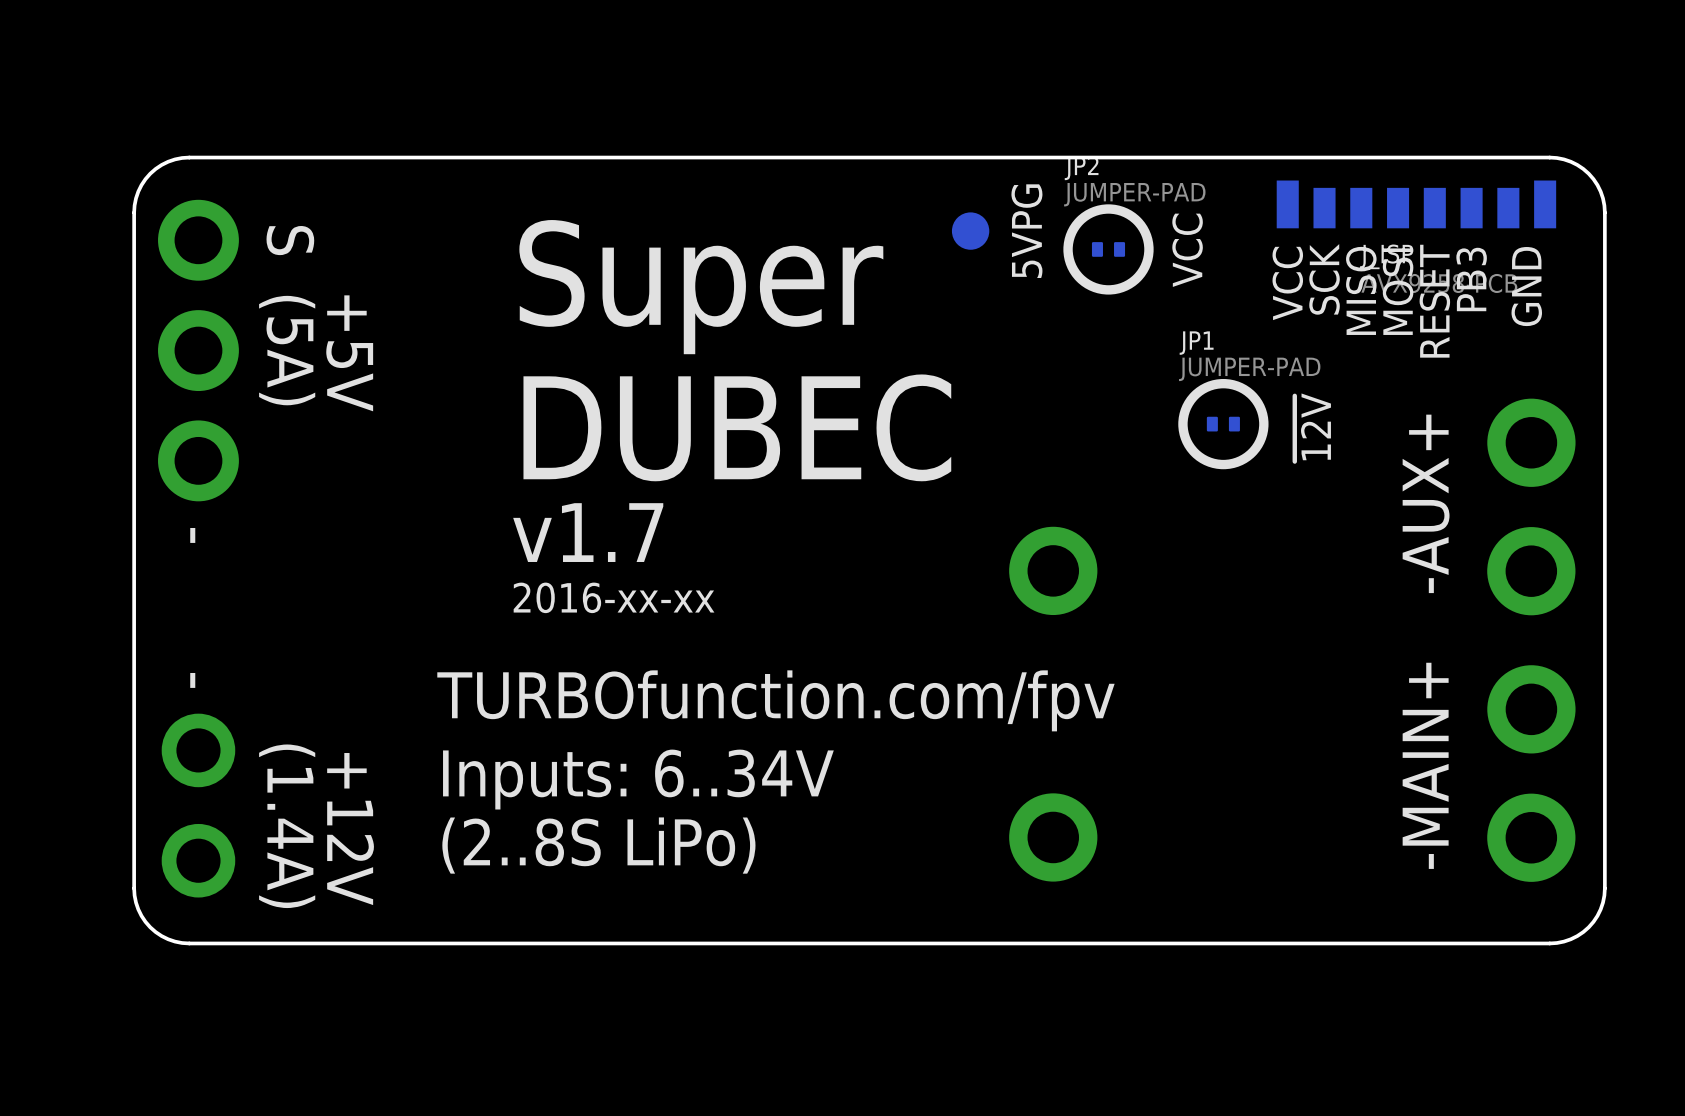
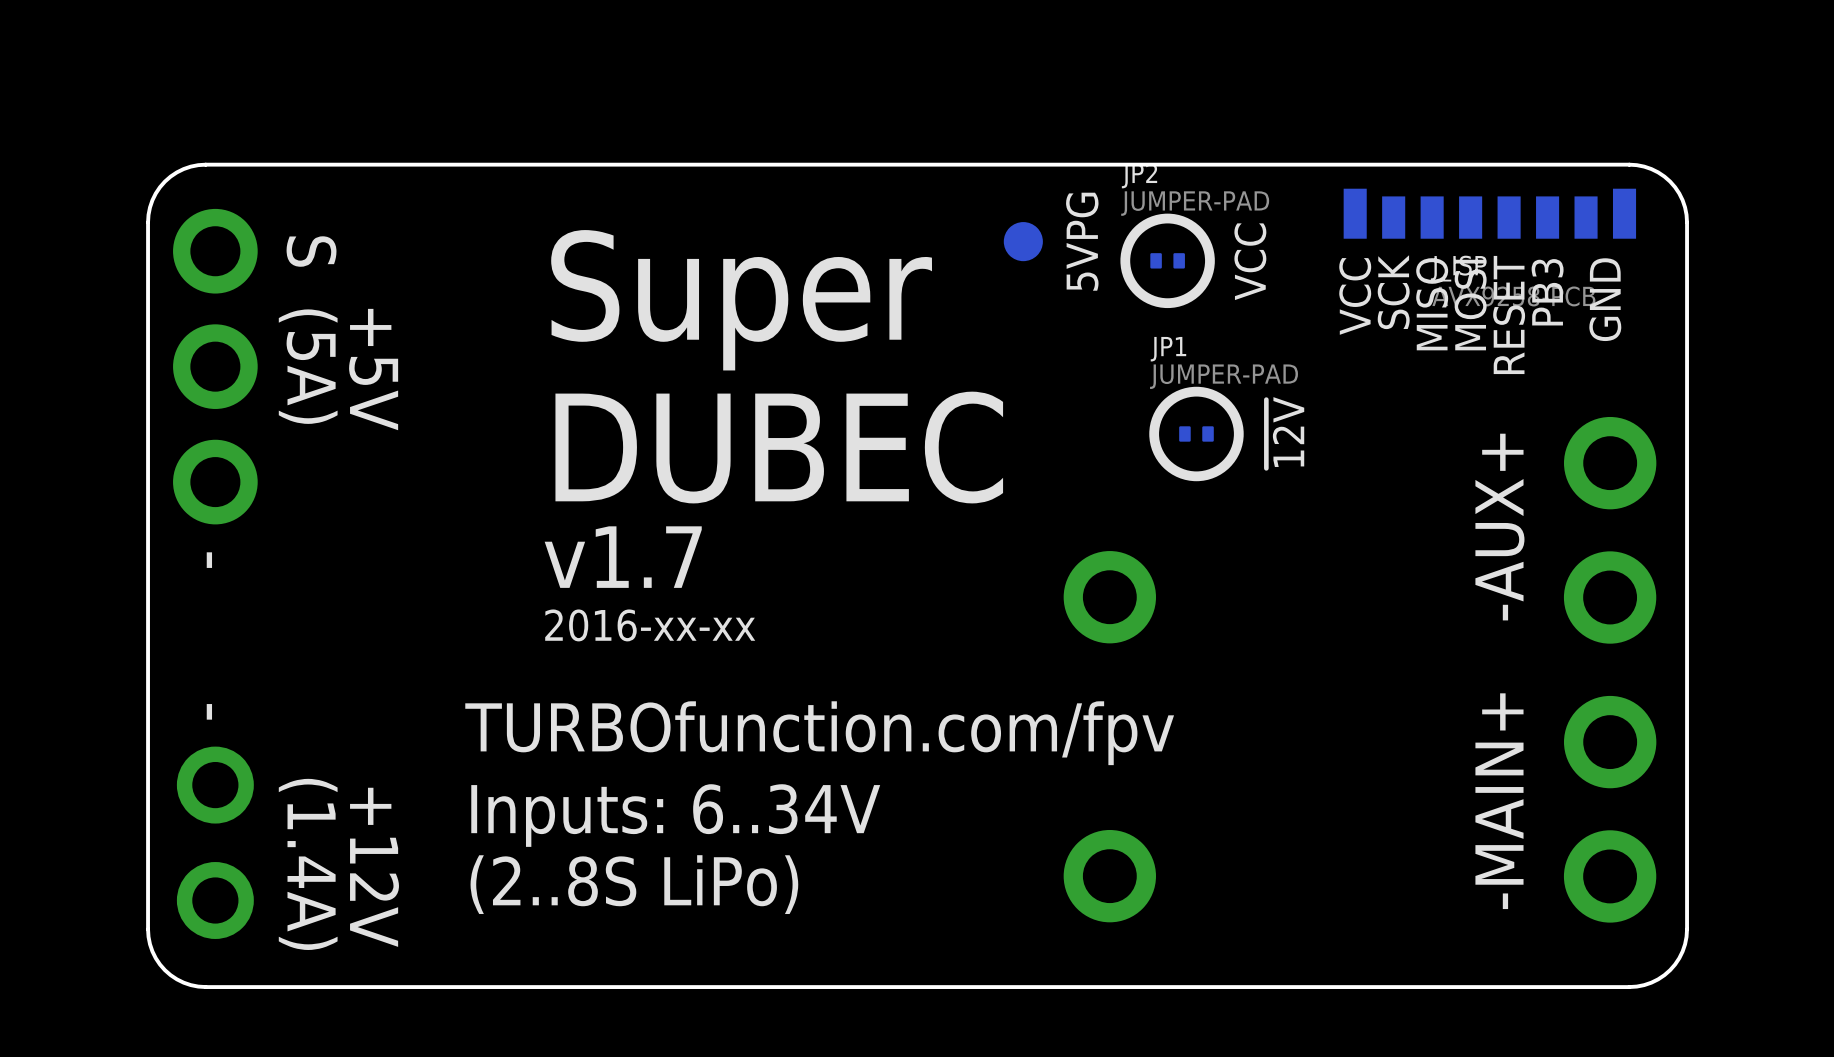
JP1 position: (1223, 424) -> (1196, 433)
text position: ~{12V} (1312, 427) -> ~{12V} (1285, 432)

